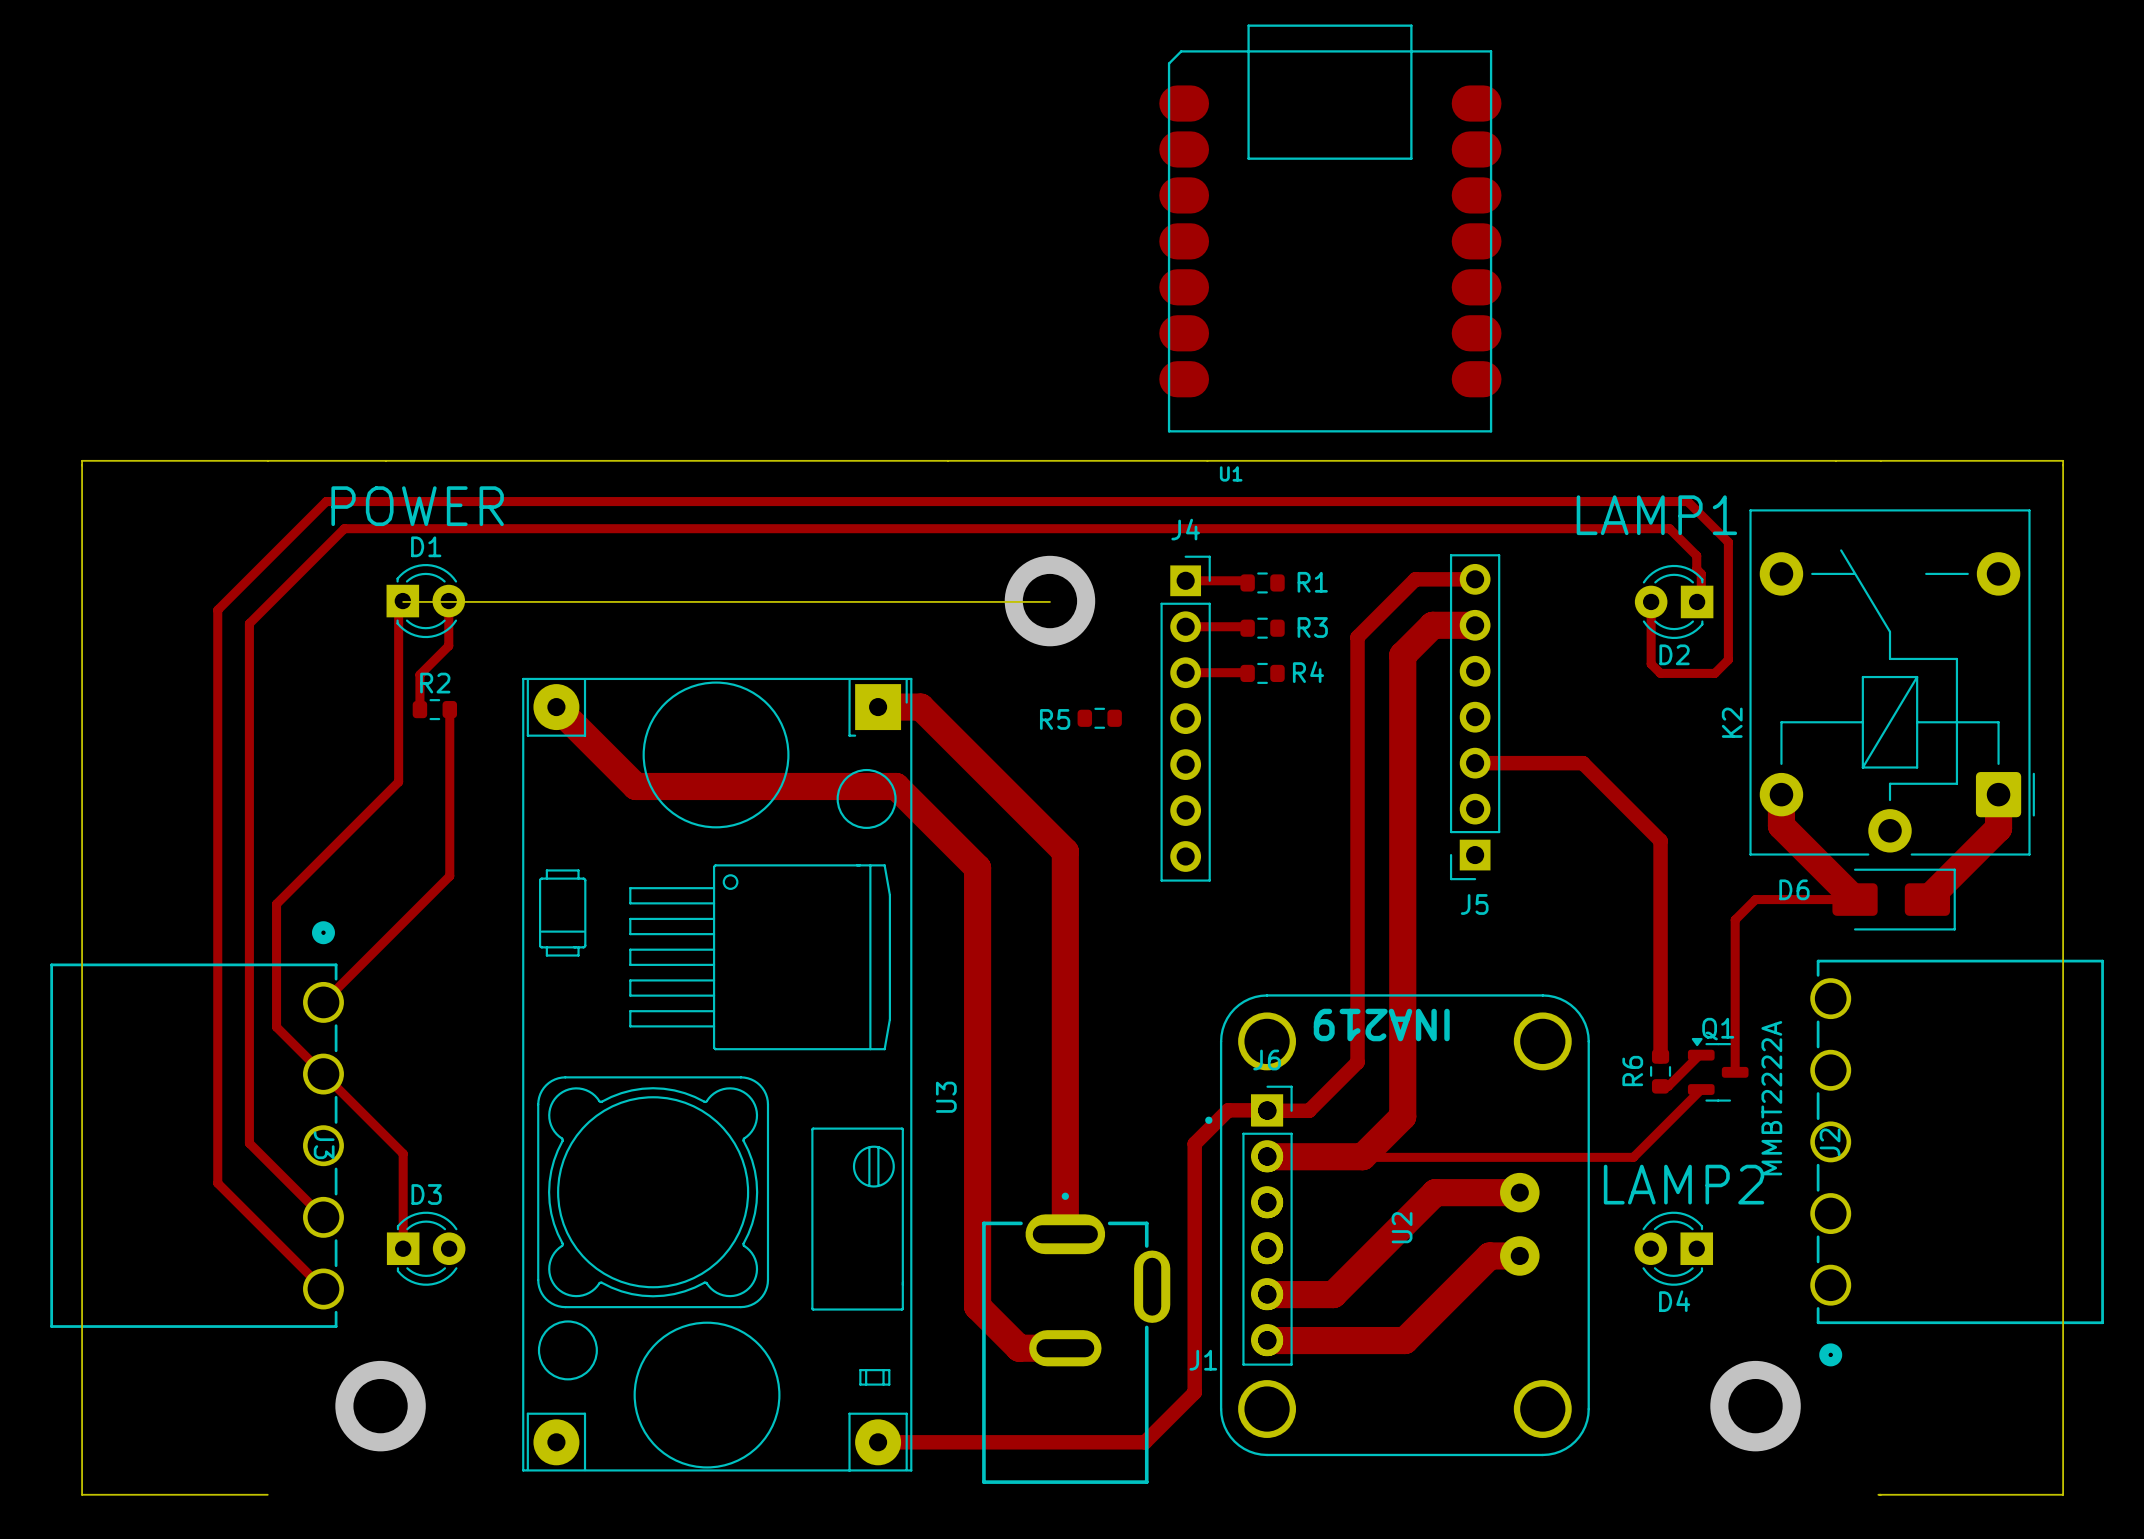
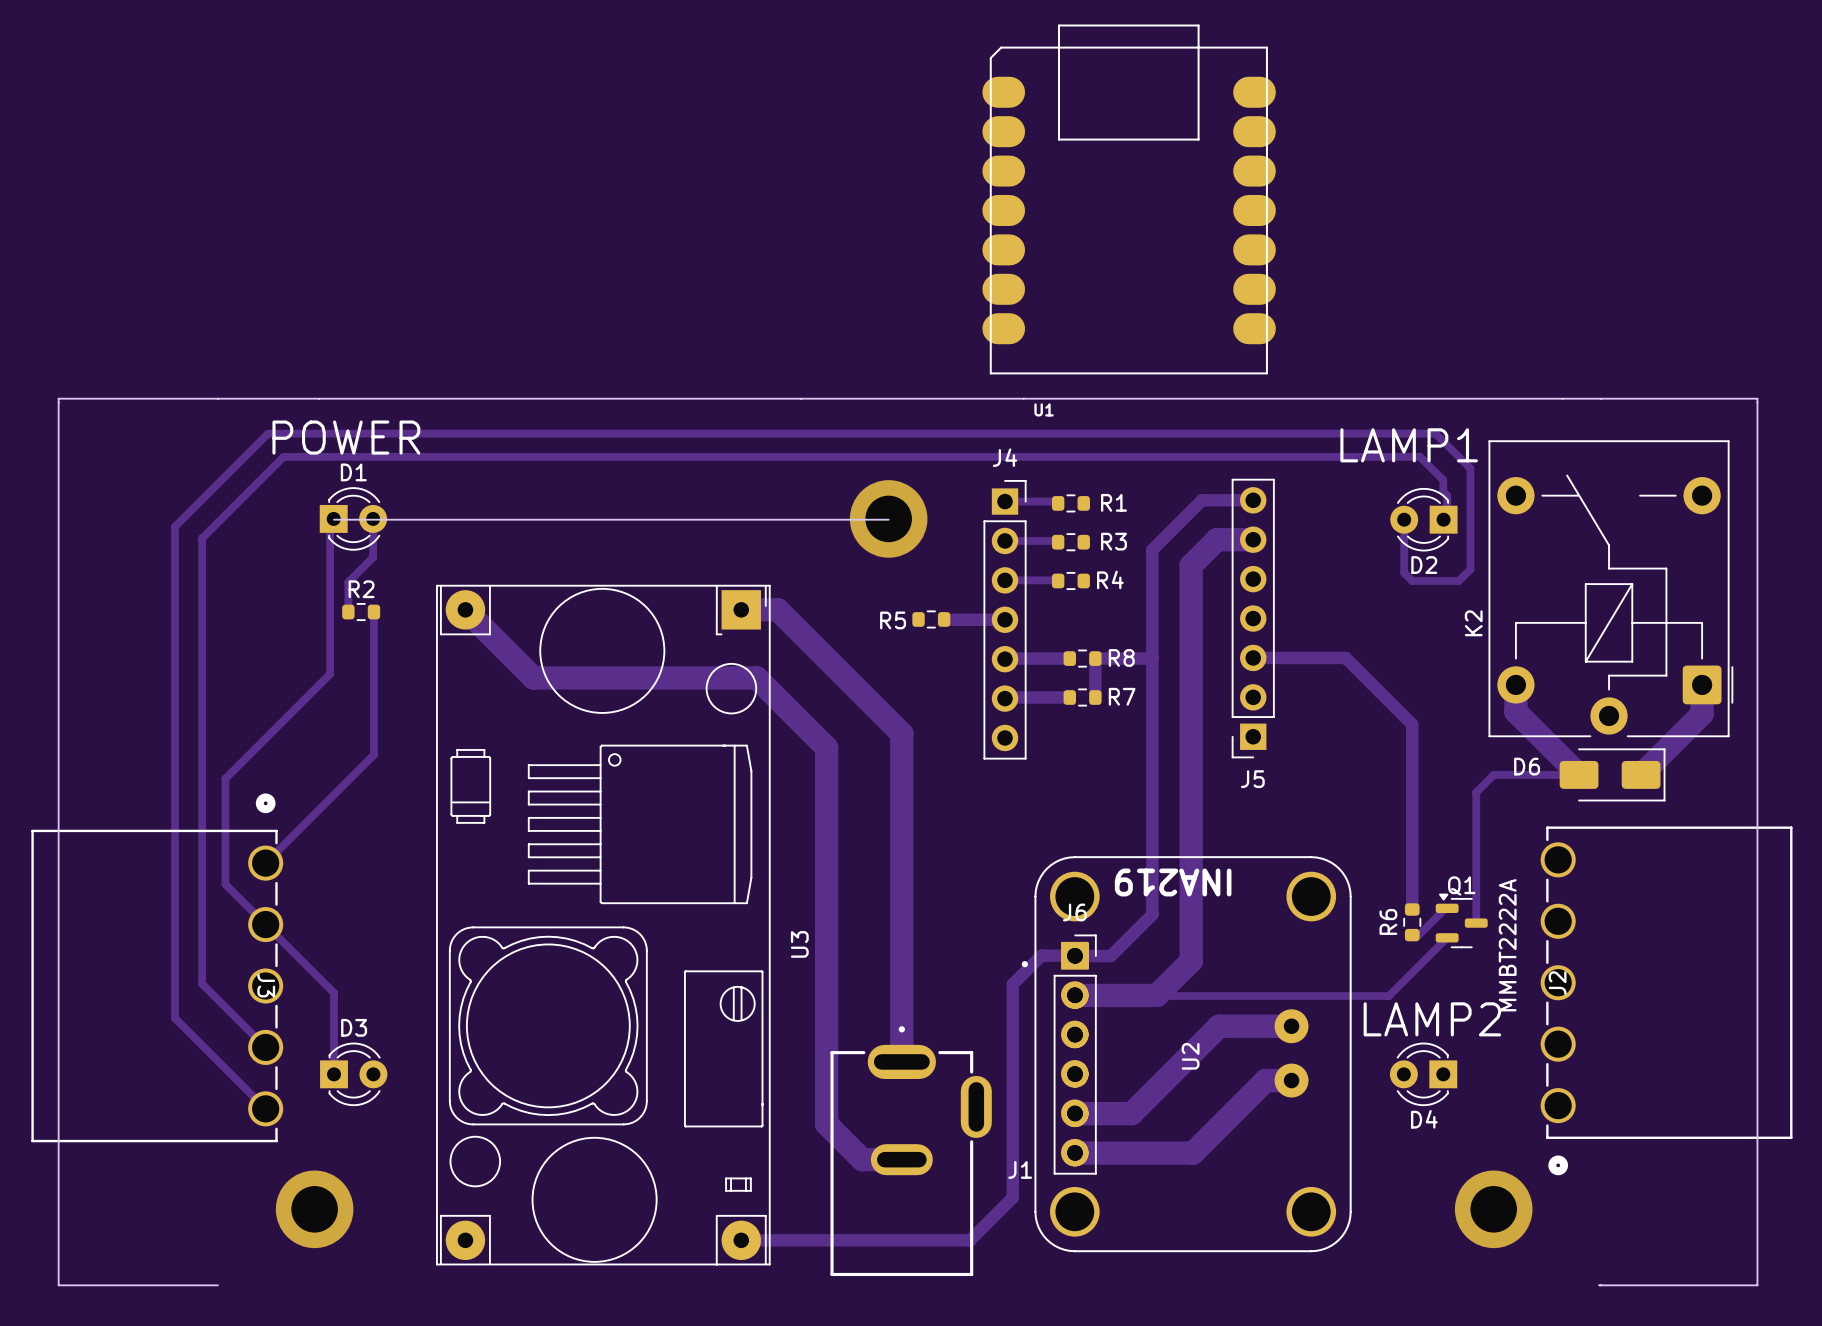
track: none -> (944, 619) (1005, 619)
track: none -> (1069, 658) (1005, 659)
R8: none -> (1082, 658)
track: none -> (1152, 658) (1095, 658) (1095, 697)
track: none -> (1069, 697) (1005, 698)
R7: none -> (1082, 697)

